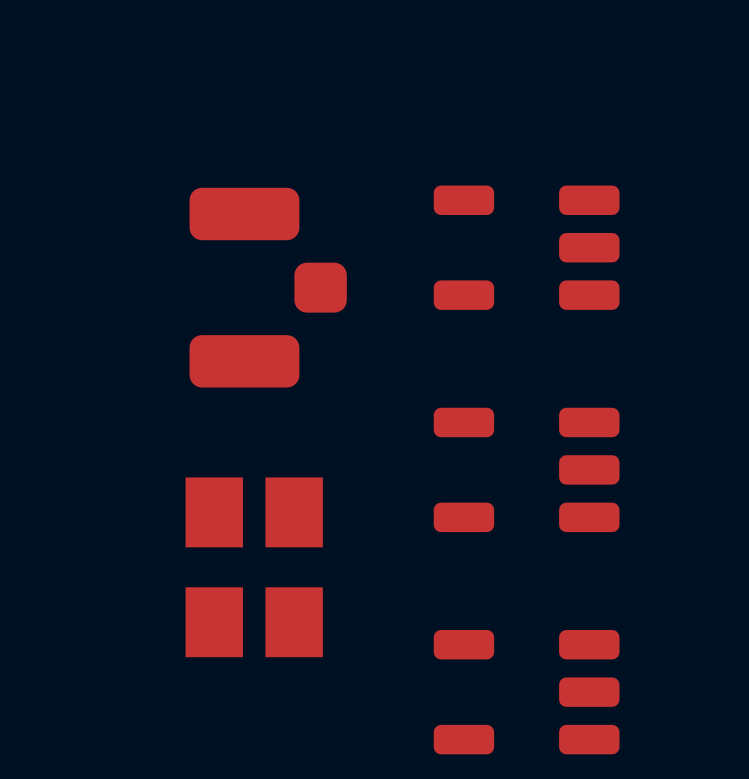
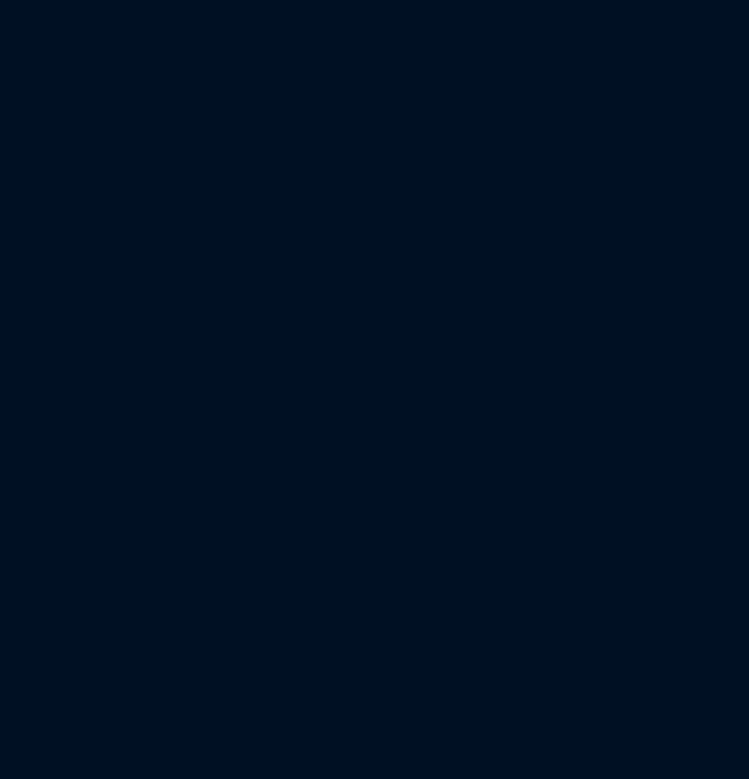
part: (526, 247) -> none
part: (268, 287) -> none
part: (526, 469) -> none
part: (254, 567) -> none
part: (526, 692) -> none

